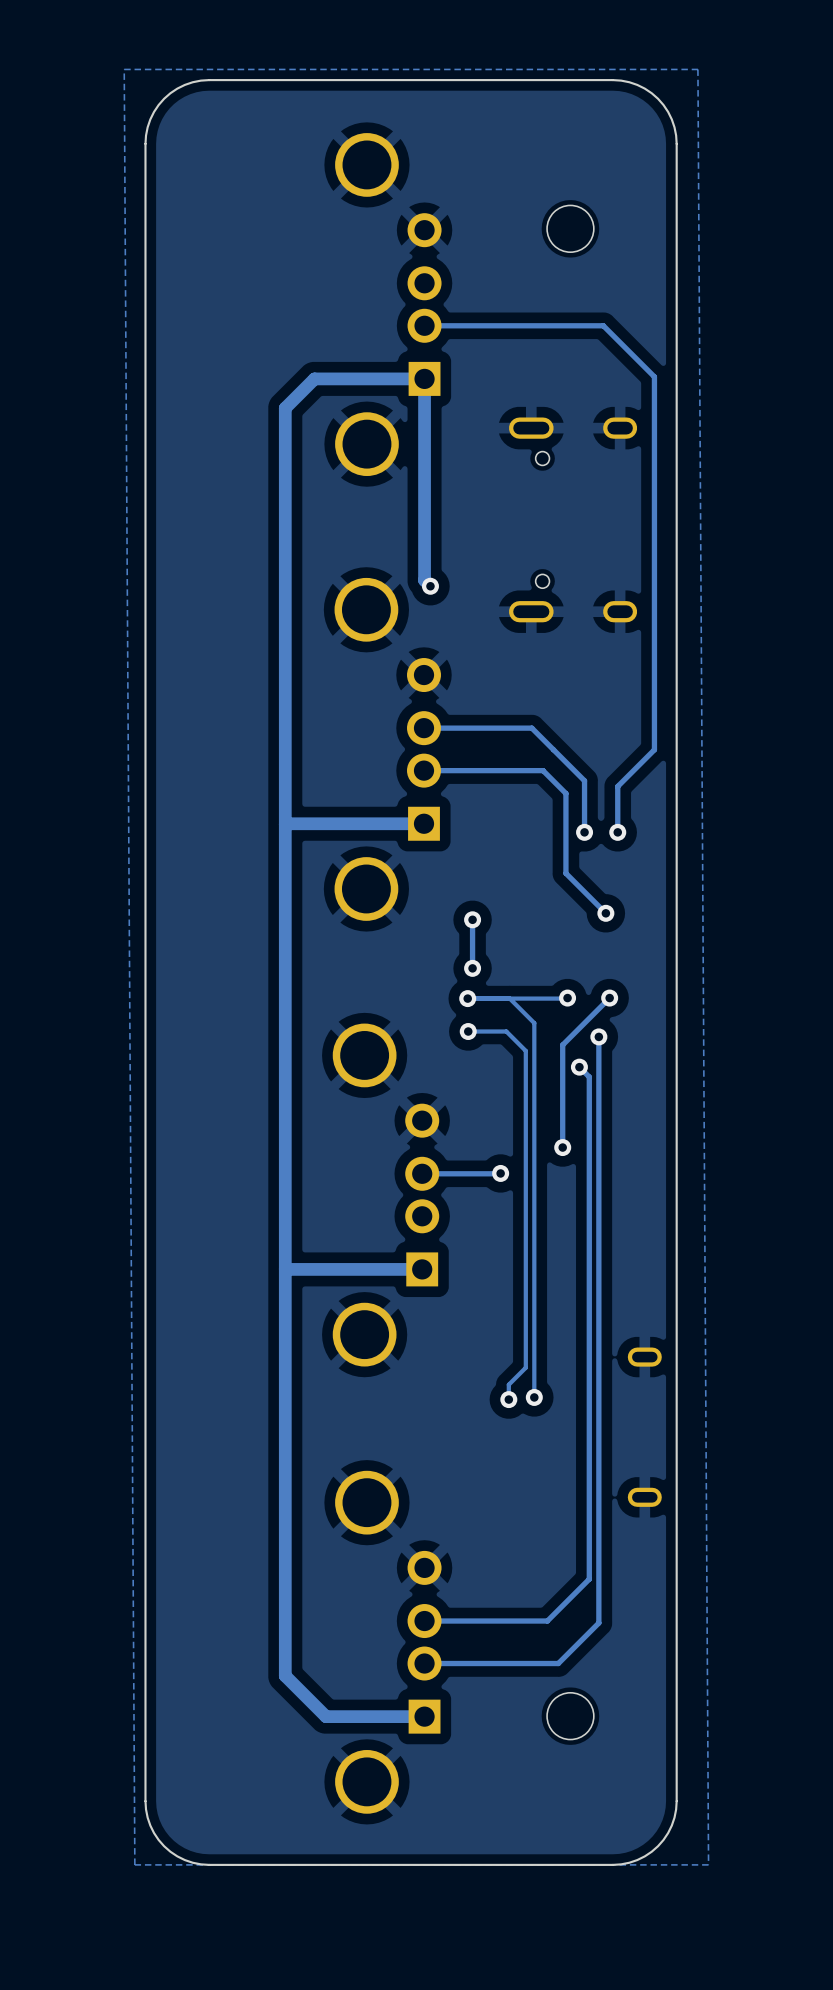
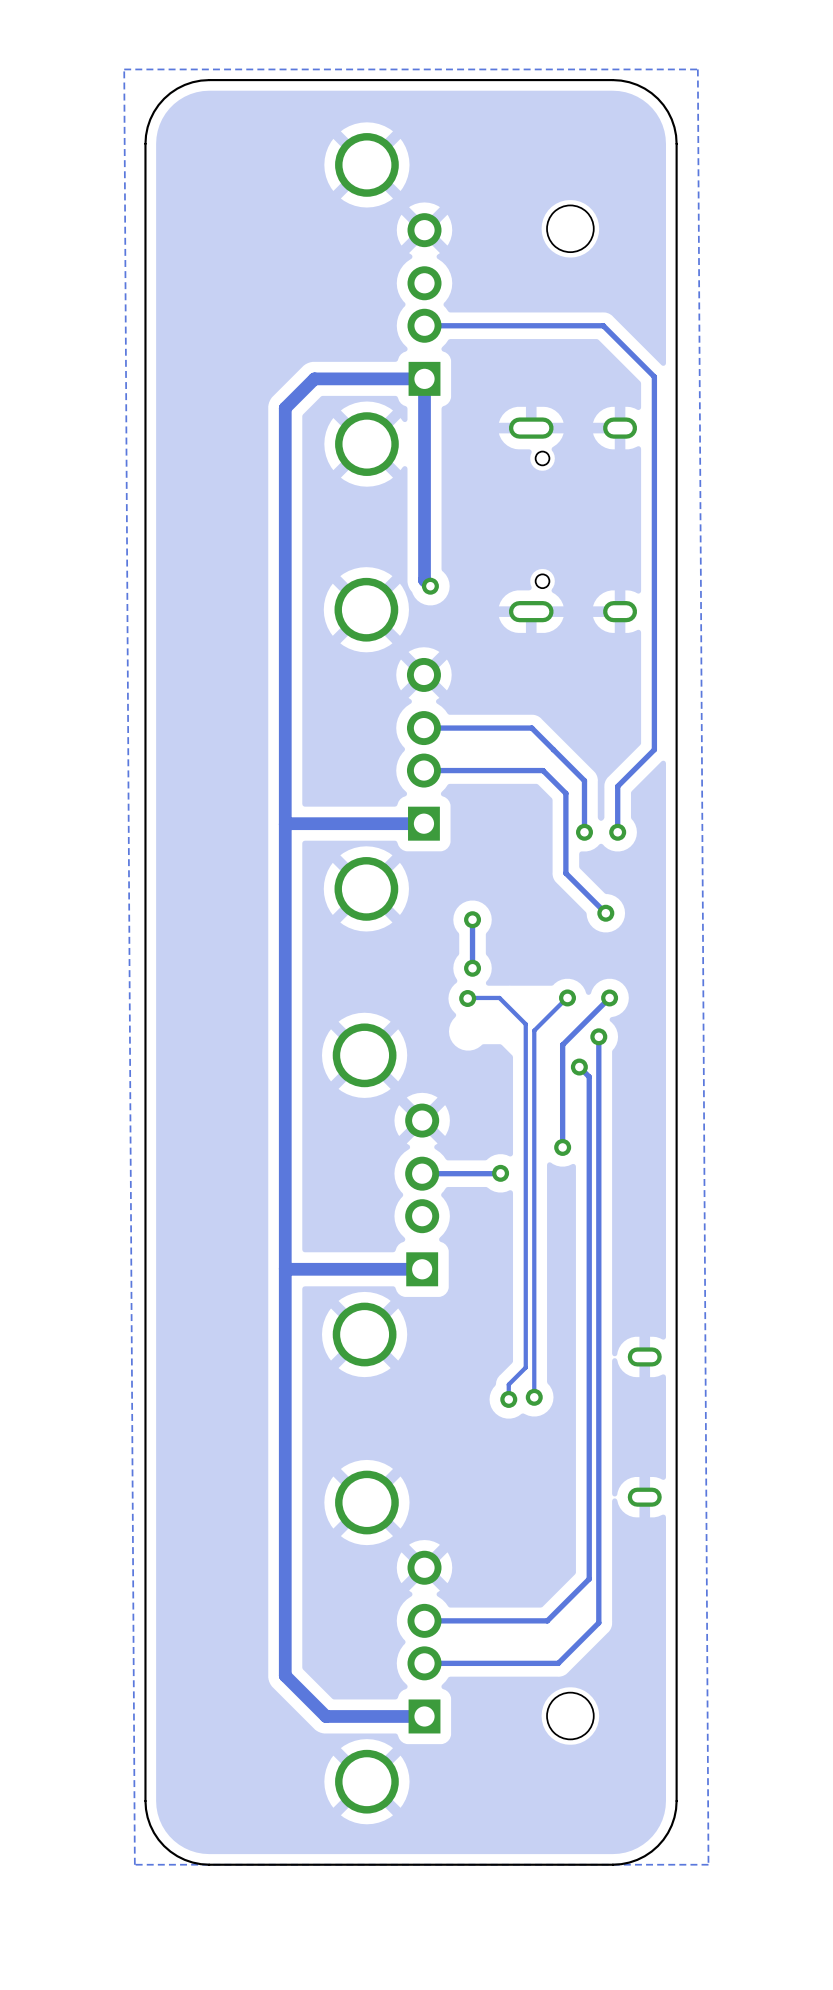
track: (509, 998) (534, 1023) (534, 1030) -> (567, 997) (534, 1030)
track: (567, 998) (467, 998) -> none
track: (468, 1031) (506, 1031) (525, 1050) -> (467, 997) (499, 997) (525, 1024) (525, 1050)
via: (468, 1031) -> none

